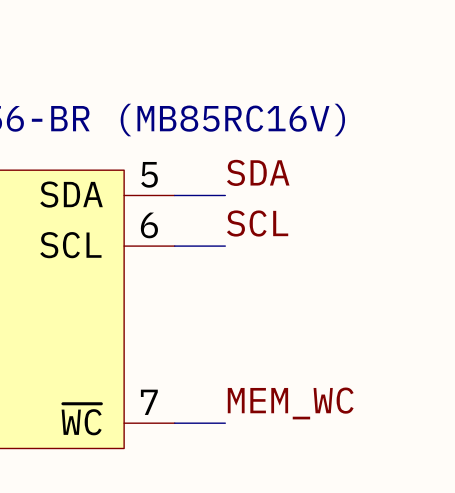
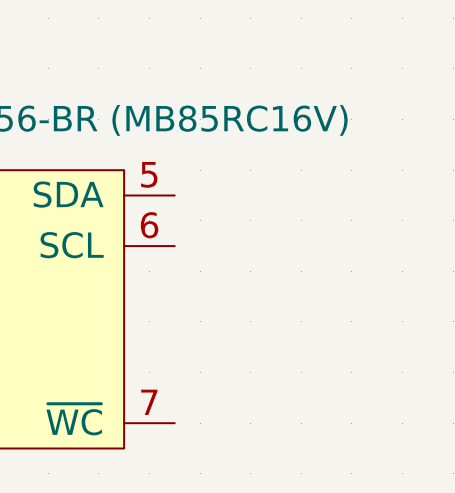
label: SDA (258, 172) -> none
wire: (174, 195) (225, 195) -> none
label: SCL (257, 223) -> none
wire: (174, 246) (225, 246) -> none
label: MEM_WC (290, 403) -> none
wire: (174, 423) (225, 423) -> none

